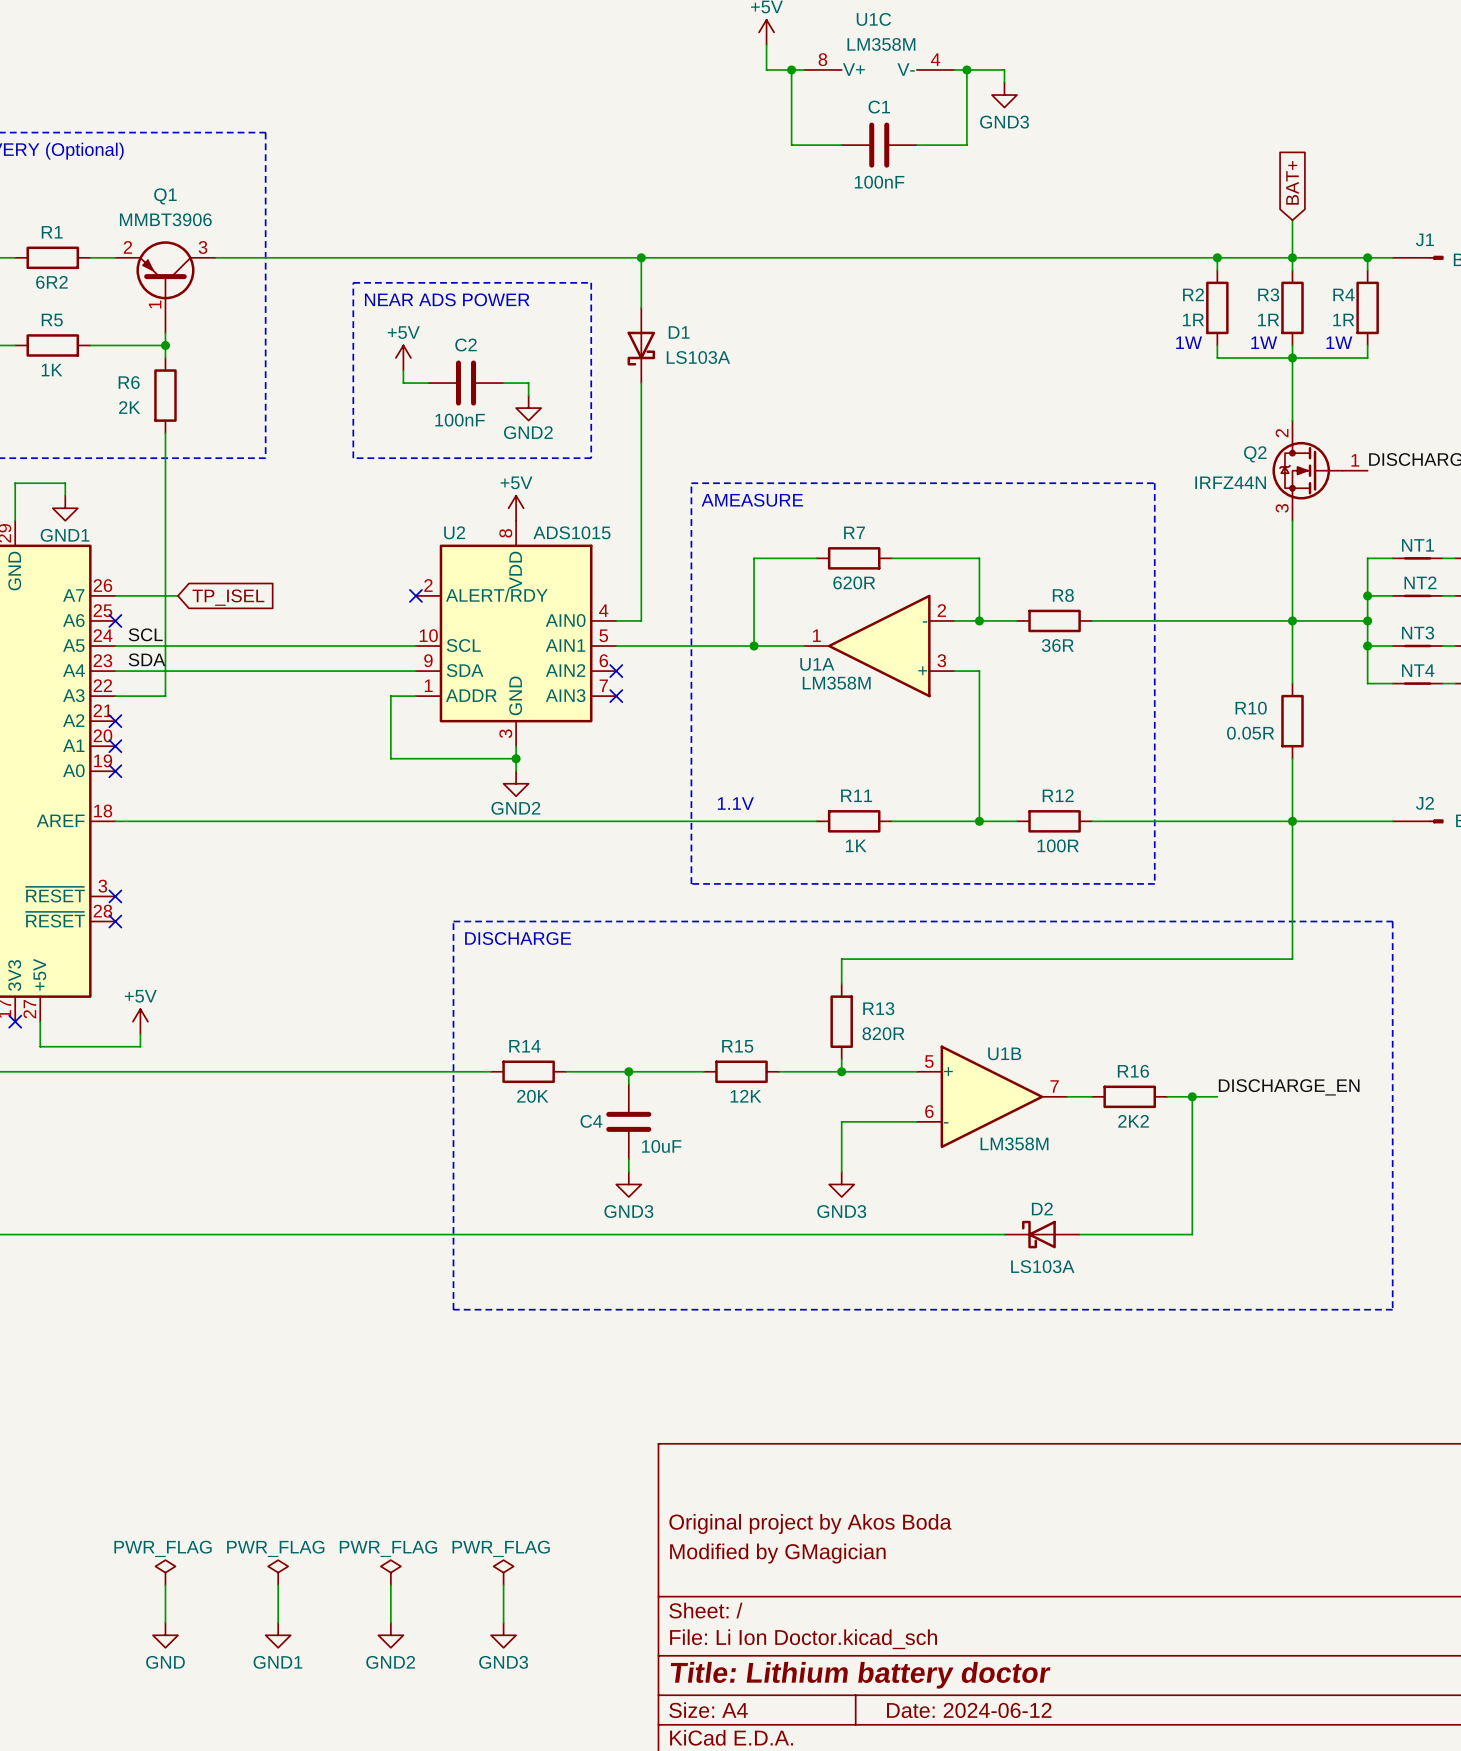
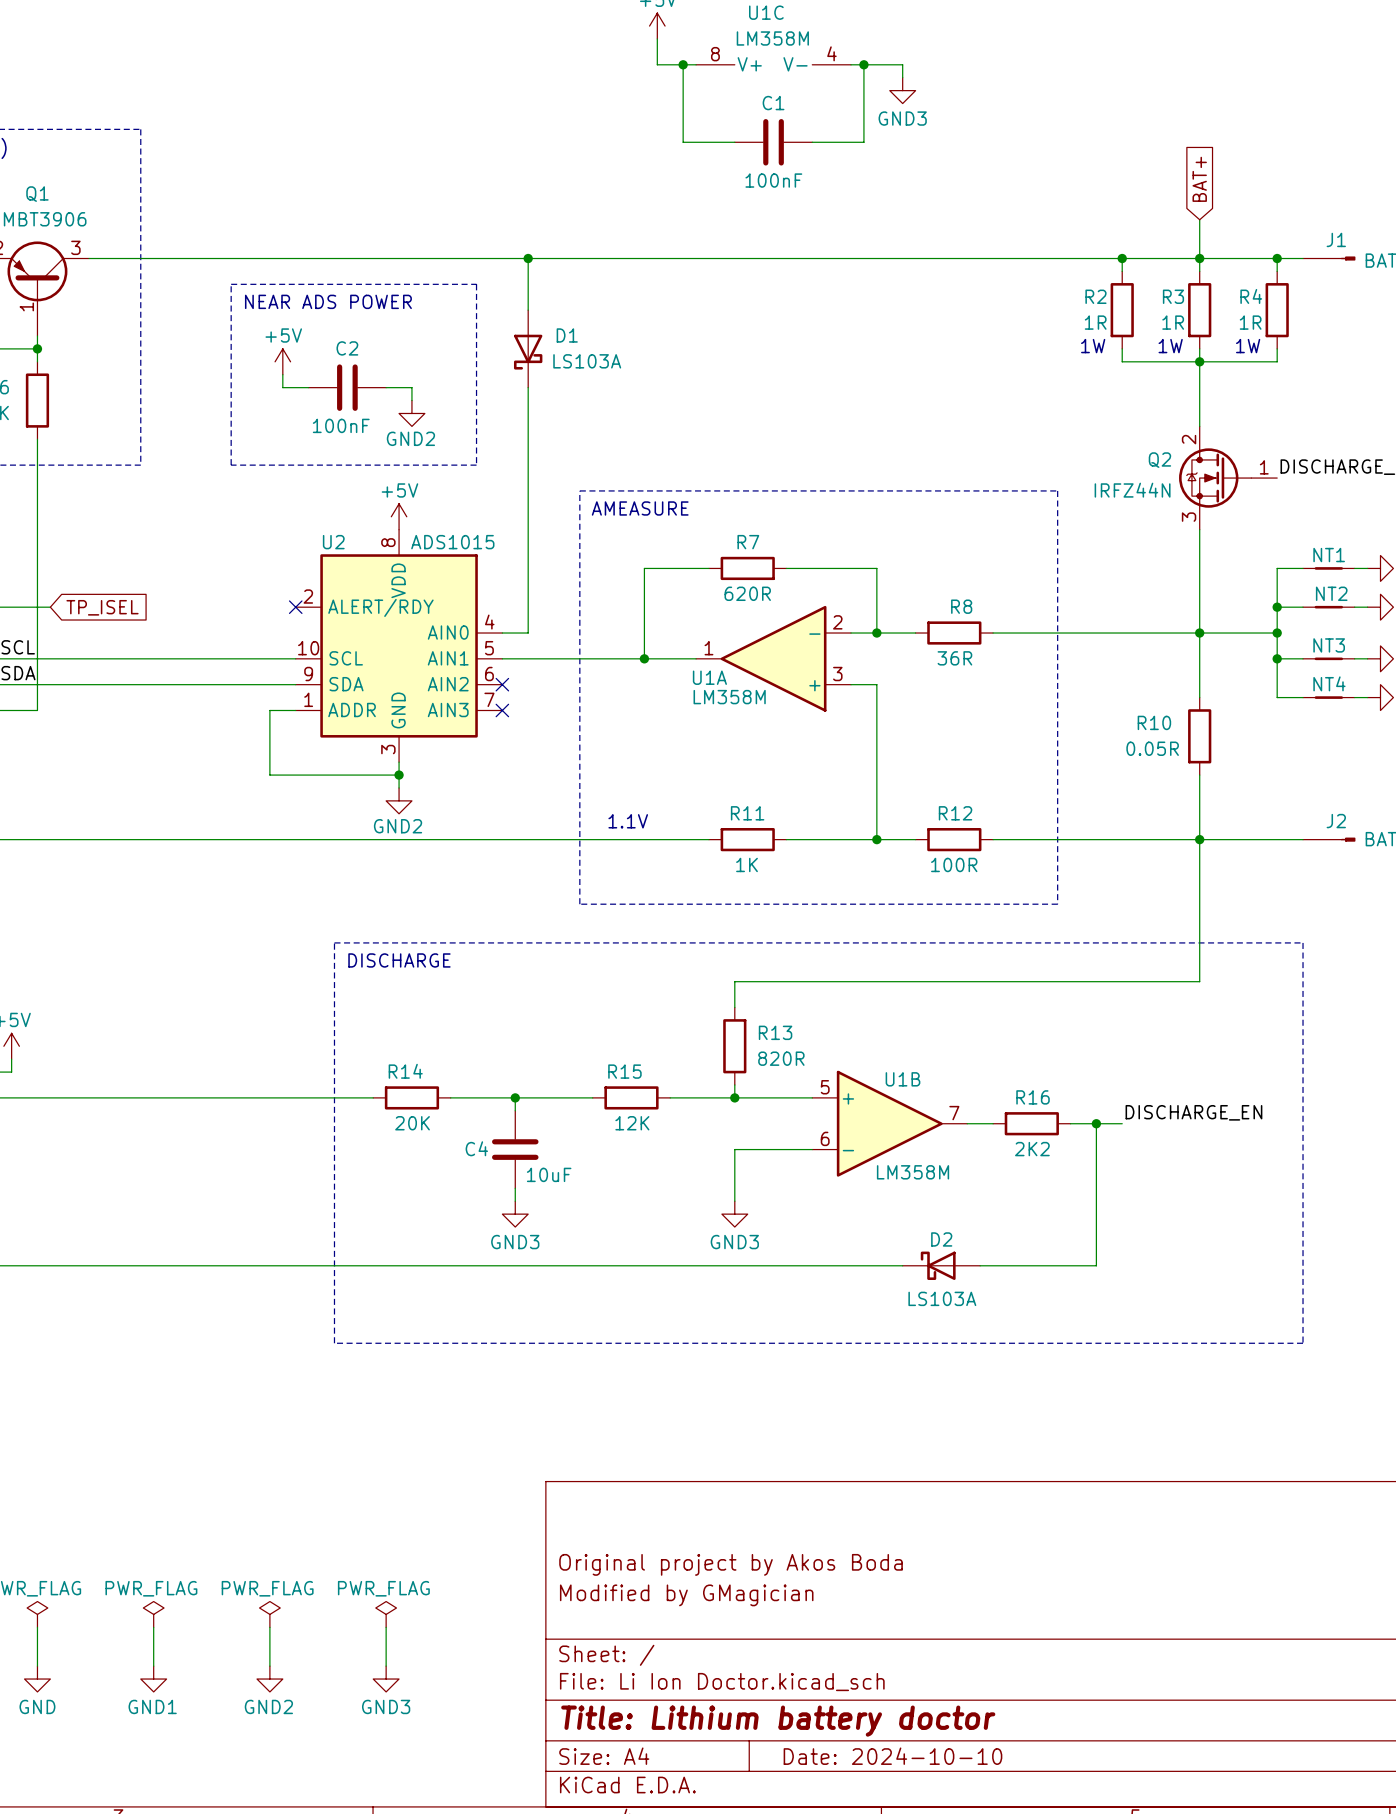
title block: Date: 2024-06-12 (969, 1710) -> Date: 2024-10-10 (892, 1756)

